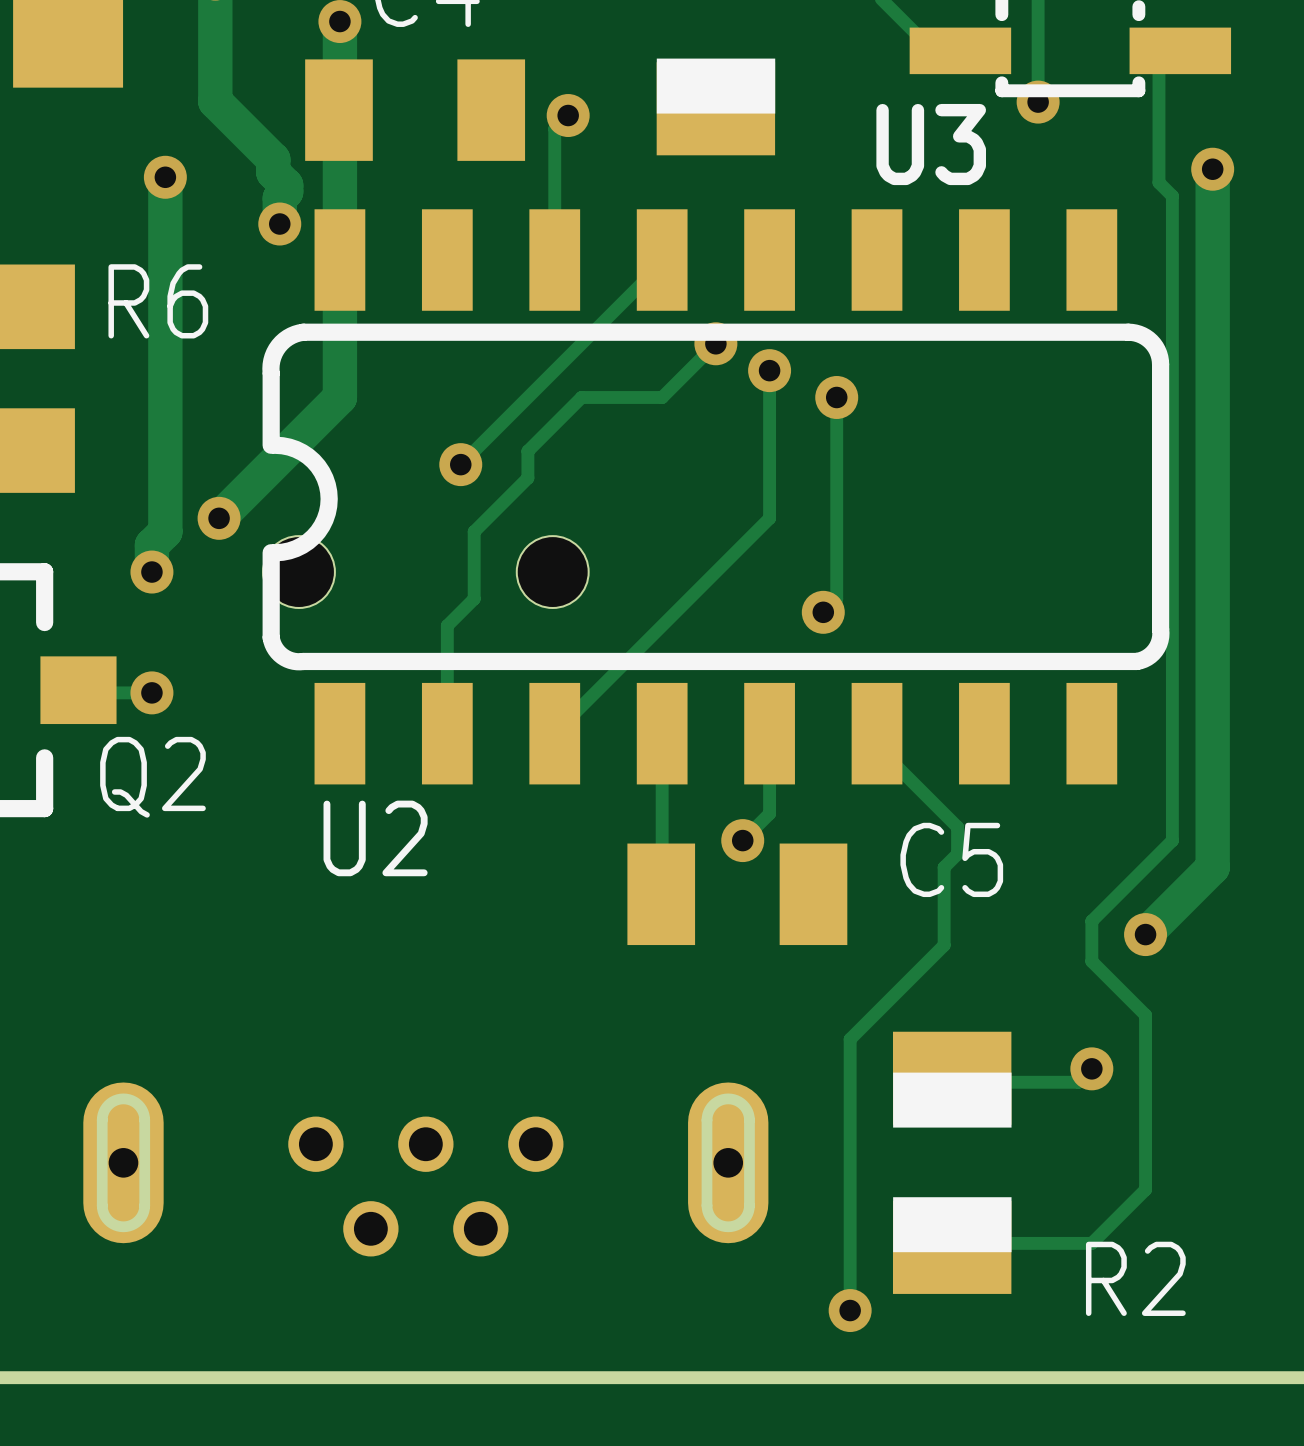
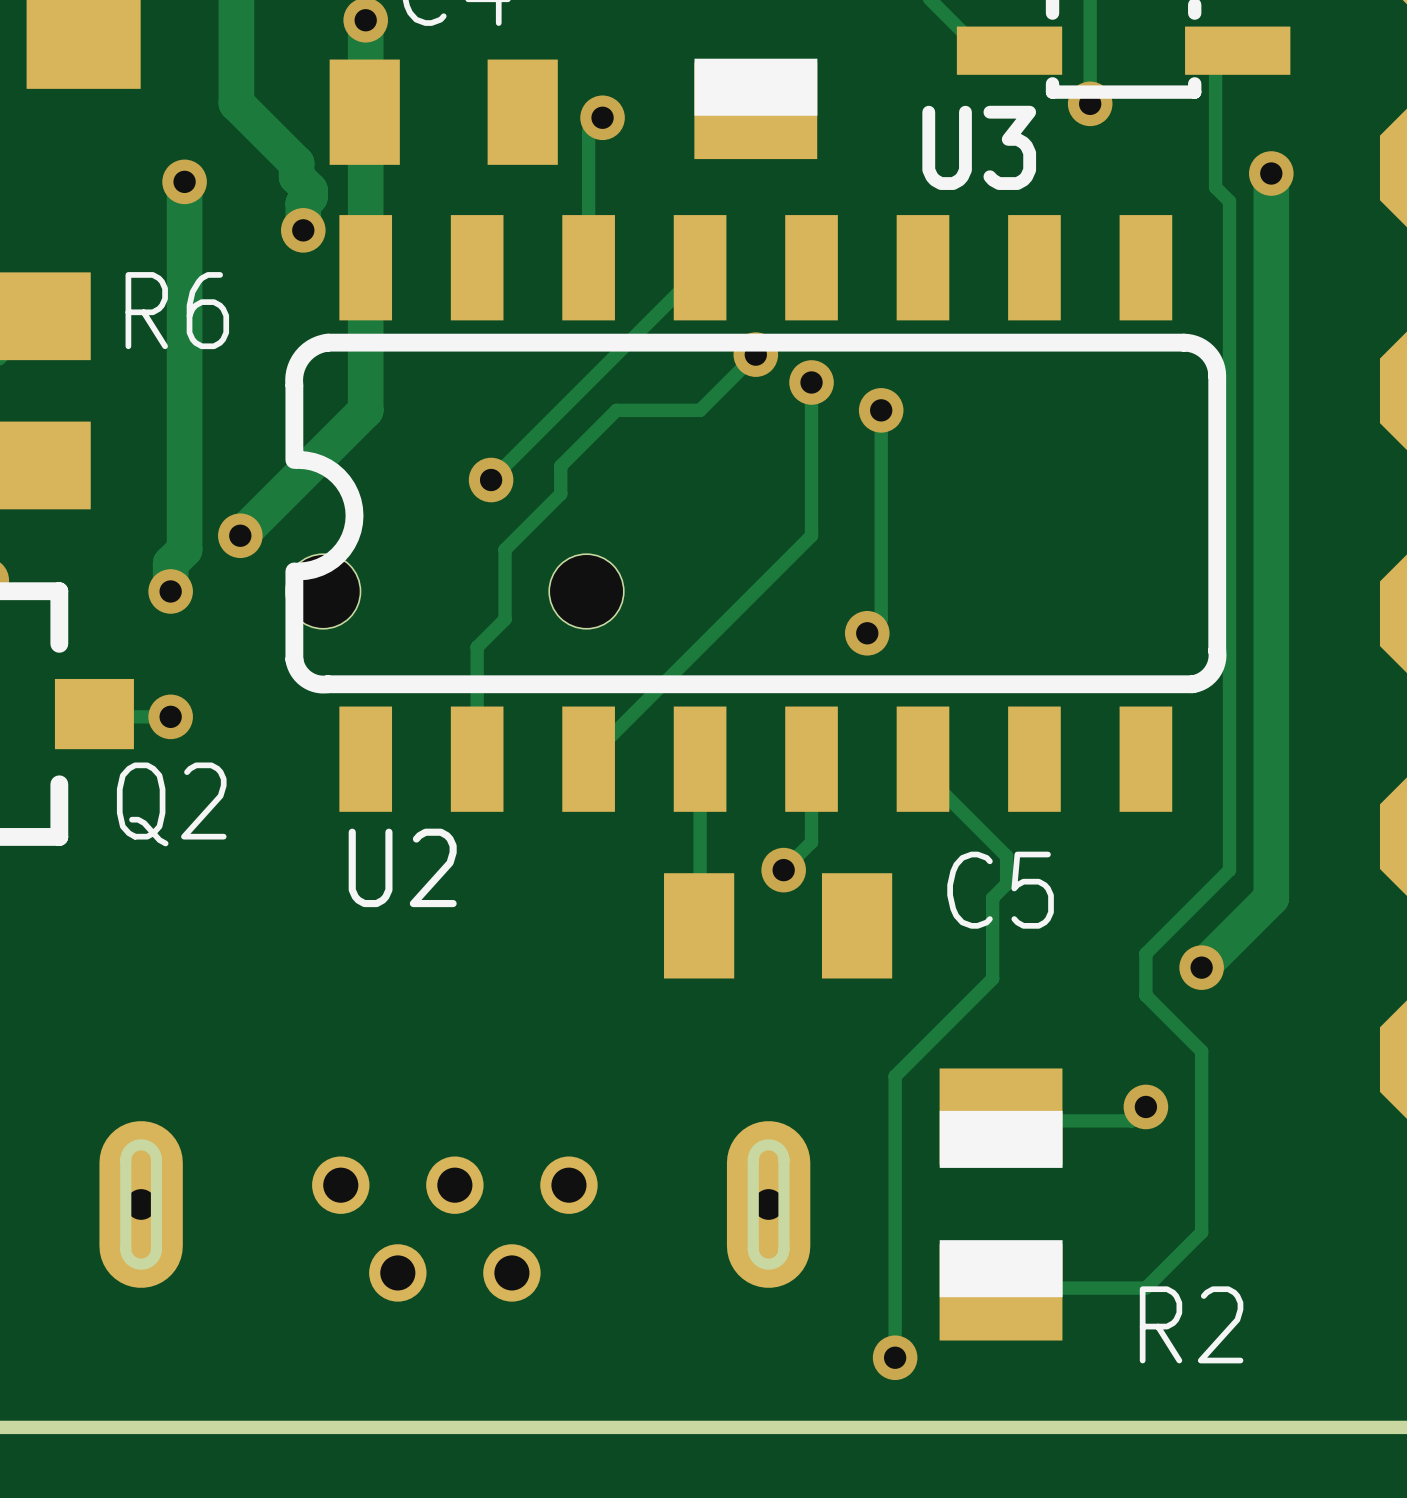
part footprint: [83, 1082, 769, 1257] -> [99, 1121, 811, 1302]

